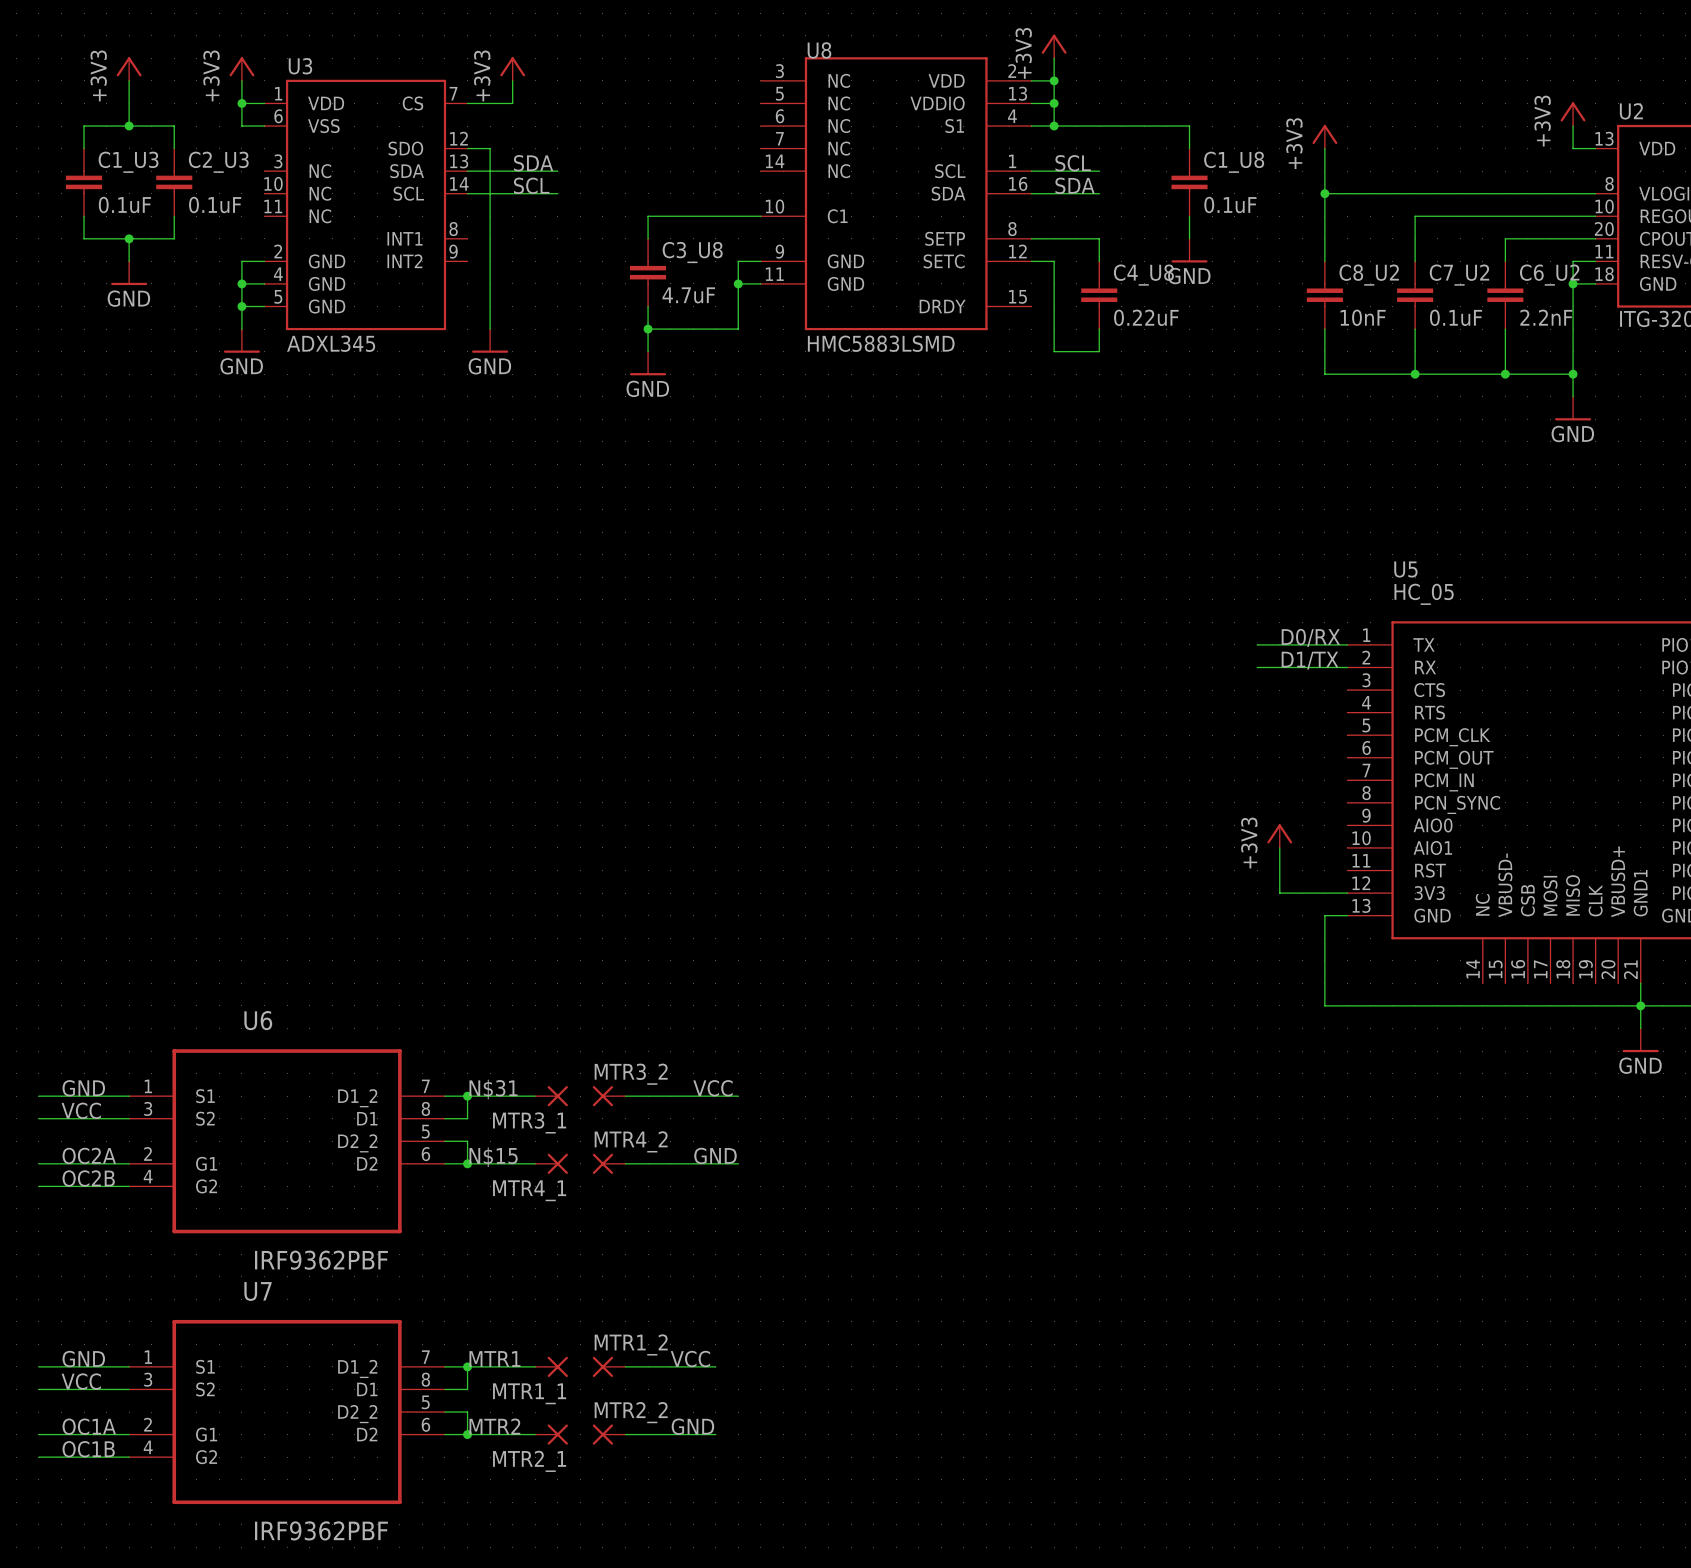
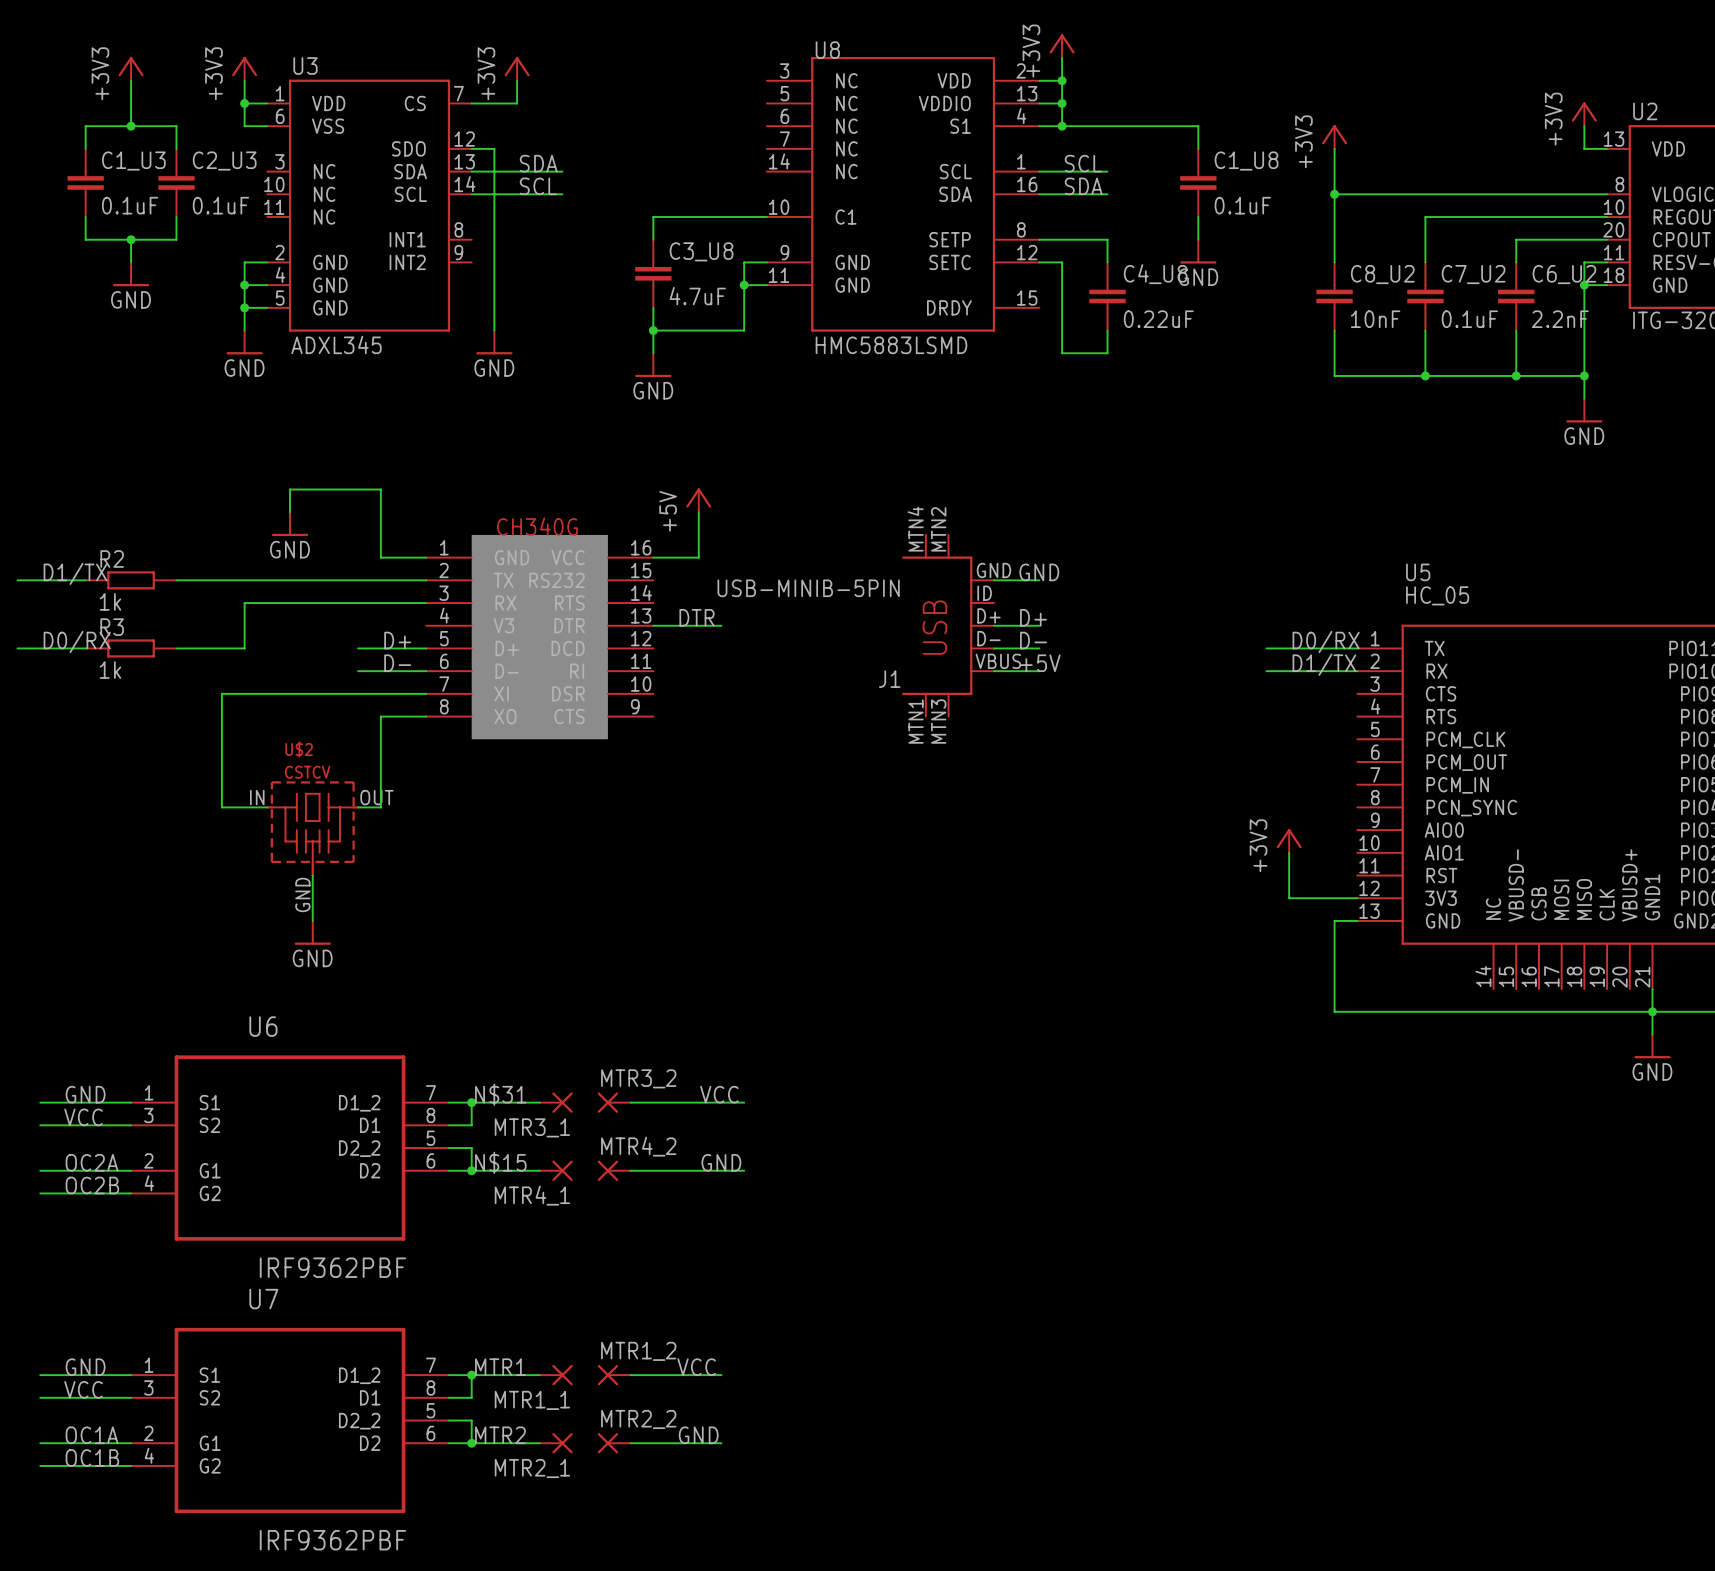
power symbol: none -> +5V (698, 500)
wire: none -> (290, 512) (290, 489) (380, 489) (380, 557) (426, 557)
wire: none -> (698, 512) (698, 557) (653, 557)
power symbol: none -> GND (290, 524)
label: none -> GND (1039, 572)
label: none -> D1/TX (75, 573)
wire: none -> (17, 580) (85, 580)
R2: none -> 1k (131, 580)
wire: none -> (176, 580) (426, 580)
wire: none -> (993, 580) (1039, 580)
wire: none -> (426, 603) (244, 603) (244, 648) (176, 648)
label: none -> DTR (696, 617)
label: none -> D+ (1033, 617)
wire: none -> (653, 625) (721, 625)
J1: none -> USB-MINIB-5PIN (947, 625)
wire: none -> (993, 625) (1039, 625)
part: none -> (539, 637)
label: none -> D0/RX (77, 642)
label: none -> D+ (397, 640)
label: none -> D- (1033, 640)
wire: none -> (17, 648) (85, 648)
R3: none -> 1k (131, 648)
wire: none -> (358, 648) (426, 648)
wire: none -> (993, 648) (1039, 648)
label: none -> D- (397, 663)
label: none -> +5V (1040, 663)
wire: none -> (358, 671) (426, 671)
wire: none -> (993, 671) (1039, 671)
wire: none -> (426, 693) (221, 693) (221, 807) (267, 807)
wire: none -> (426, 716) (380, 716) (380, 807) (358, 807)
U$2: none -> CSTCV (312, 828)
wire: none -> (312, 875) (312, 920)
power symbol: none -> GND (312, 932)

